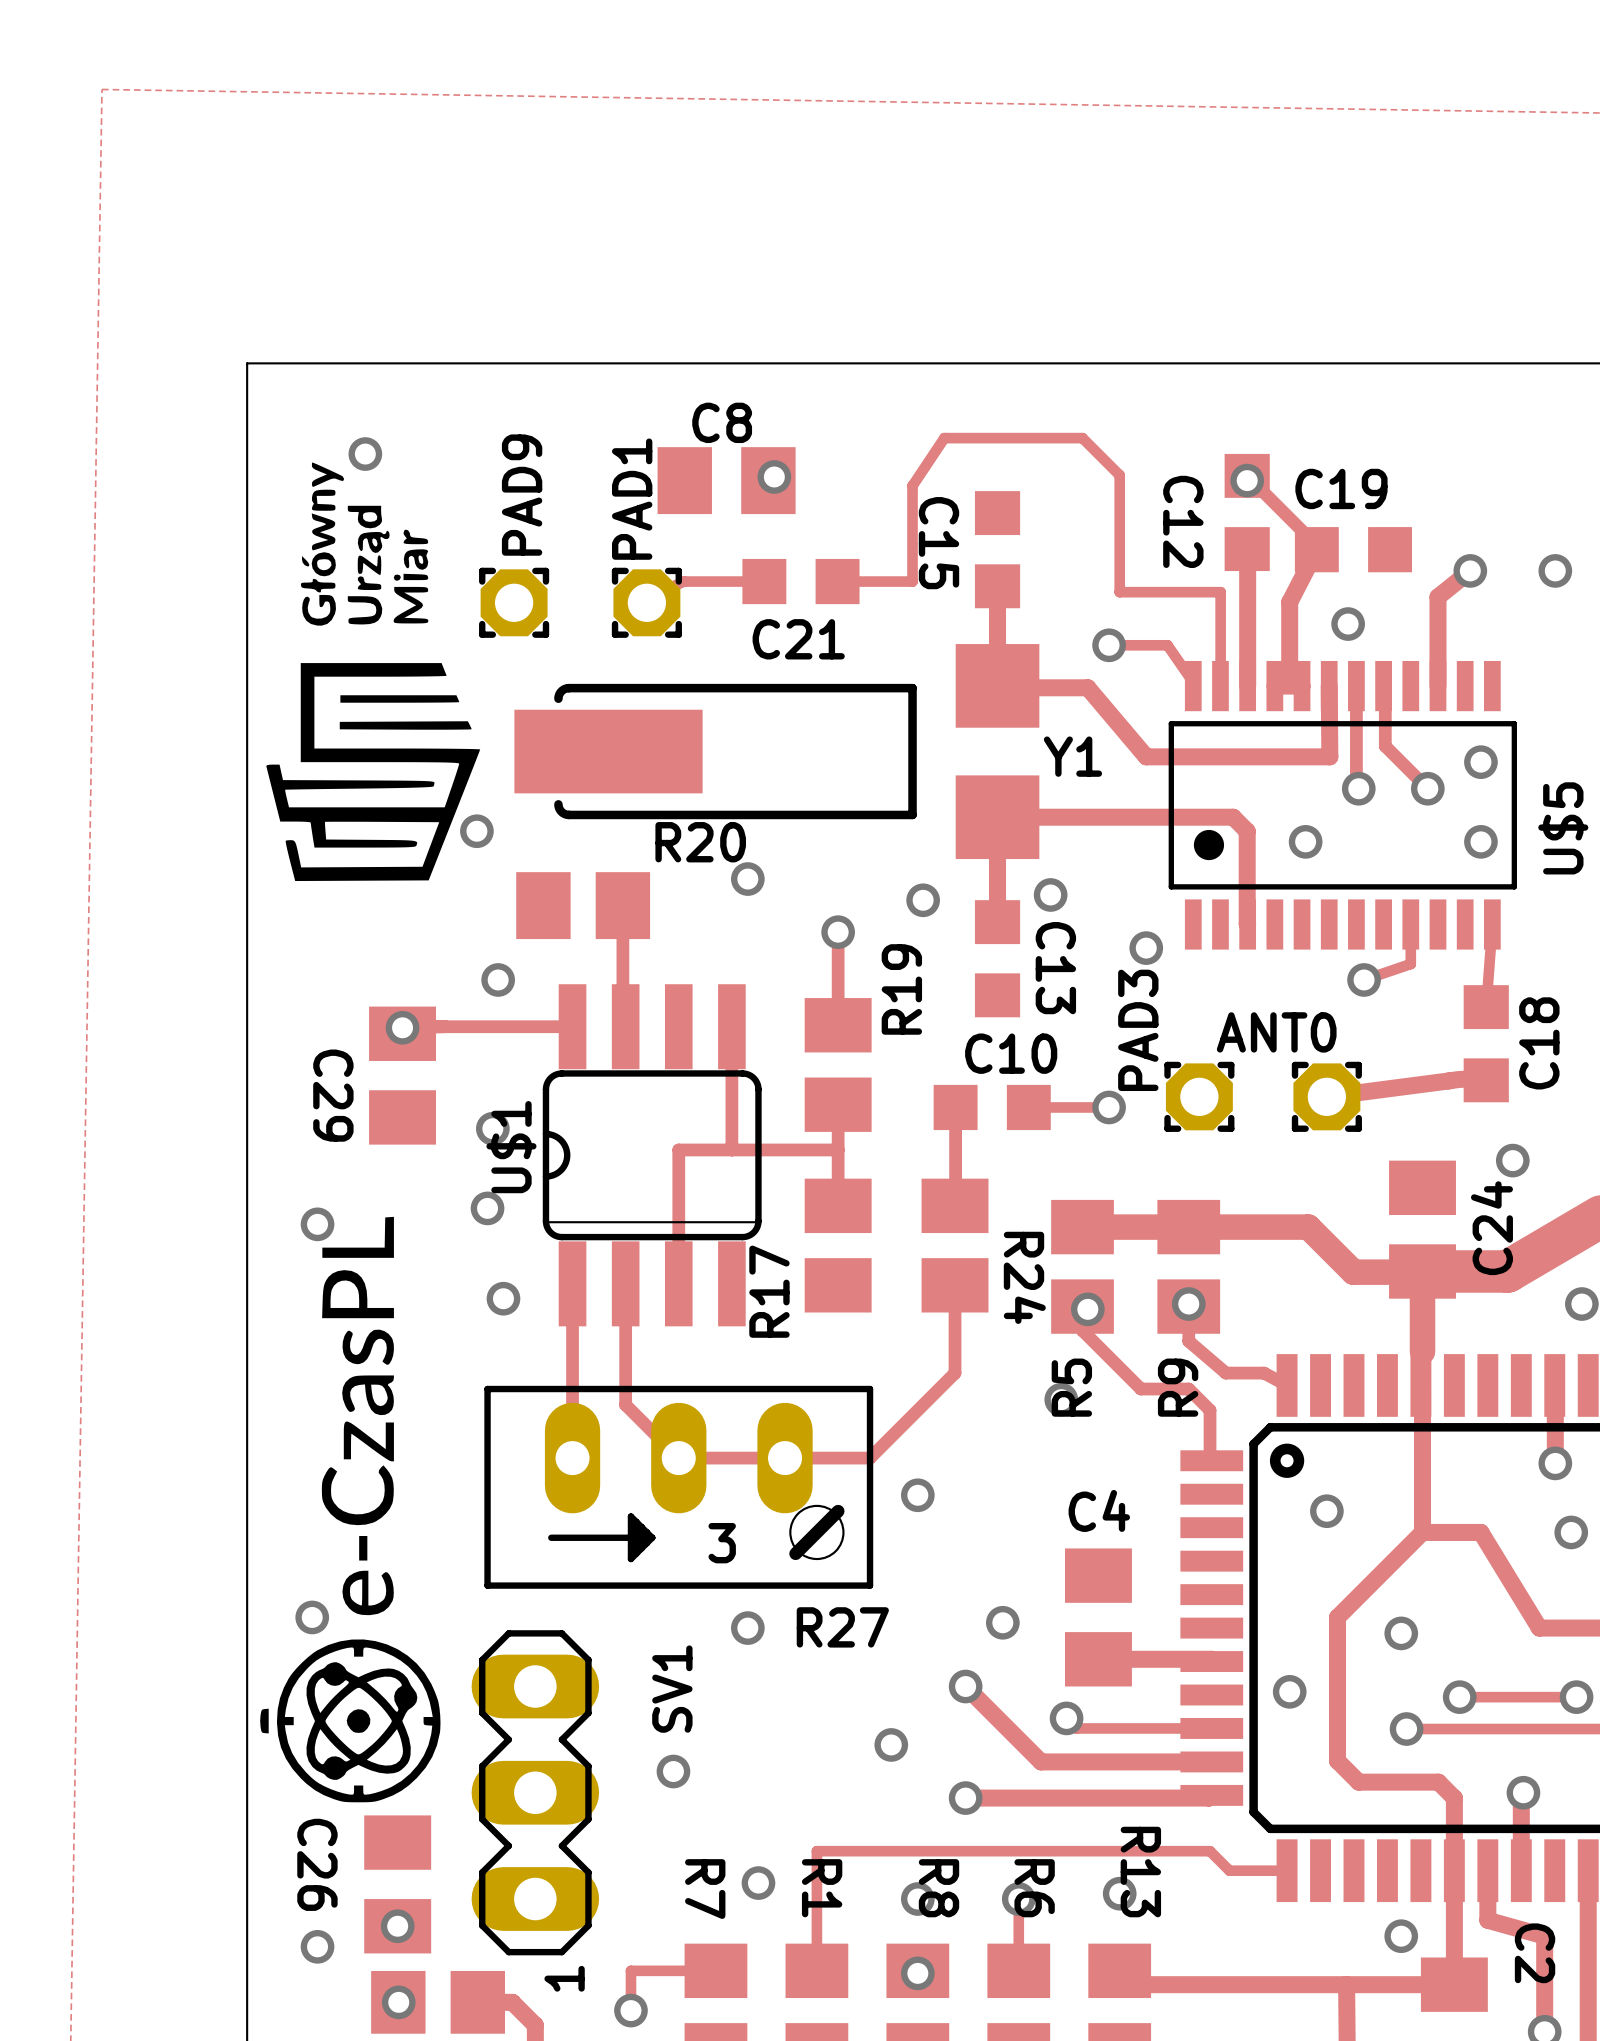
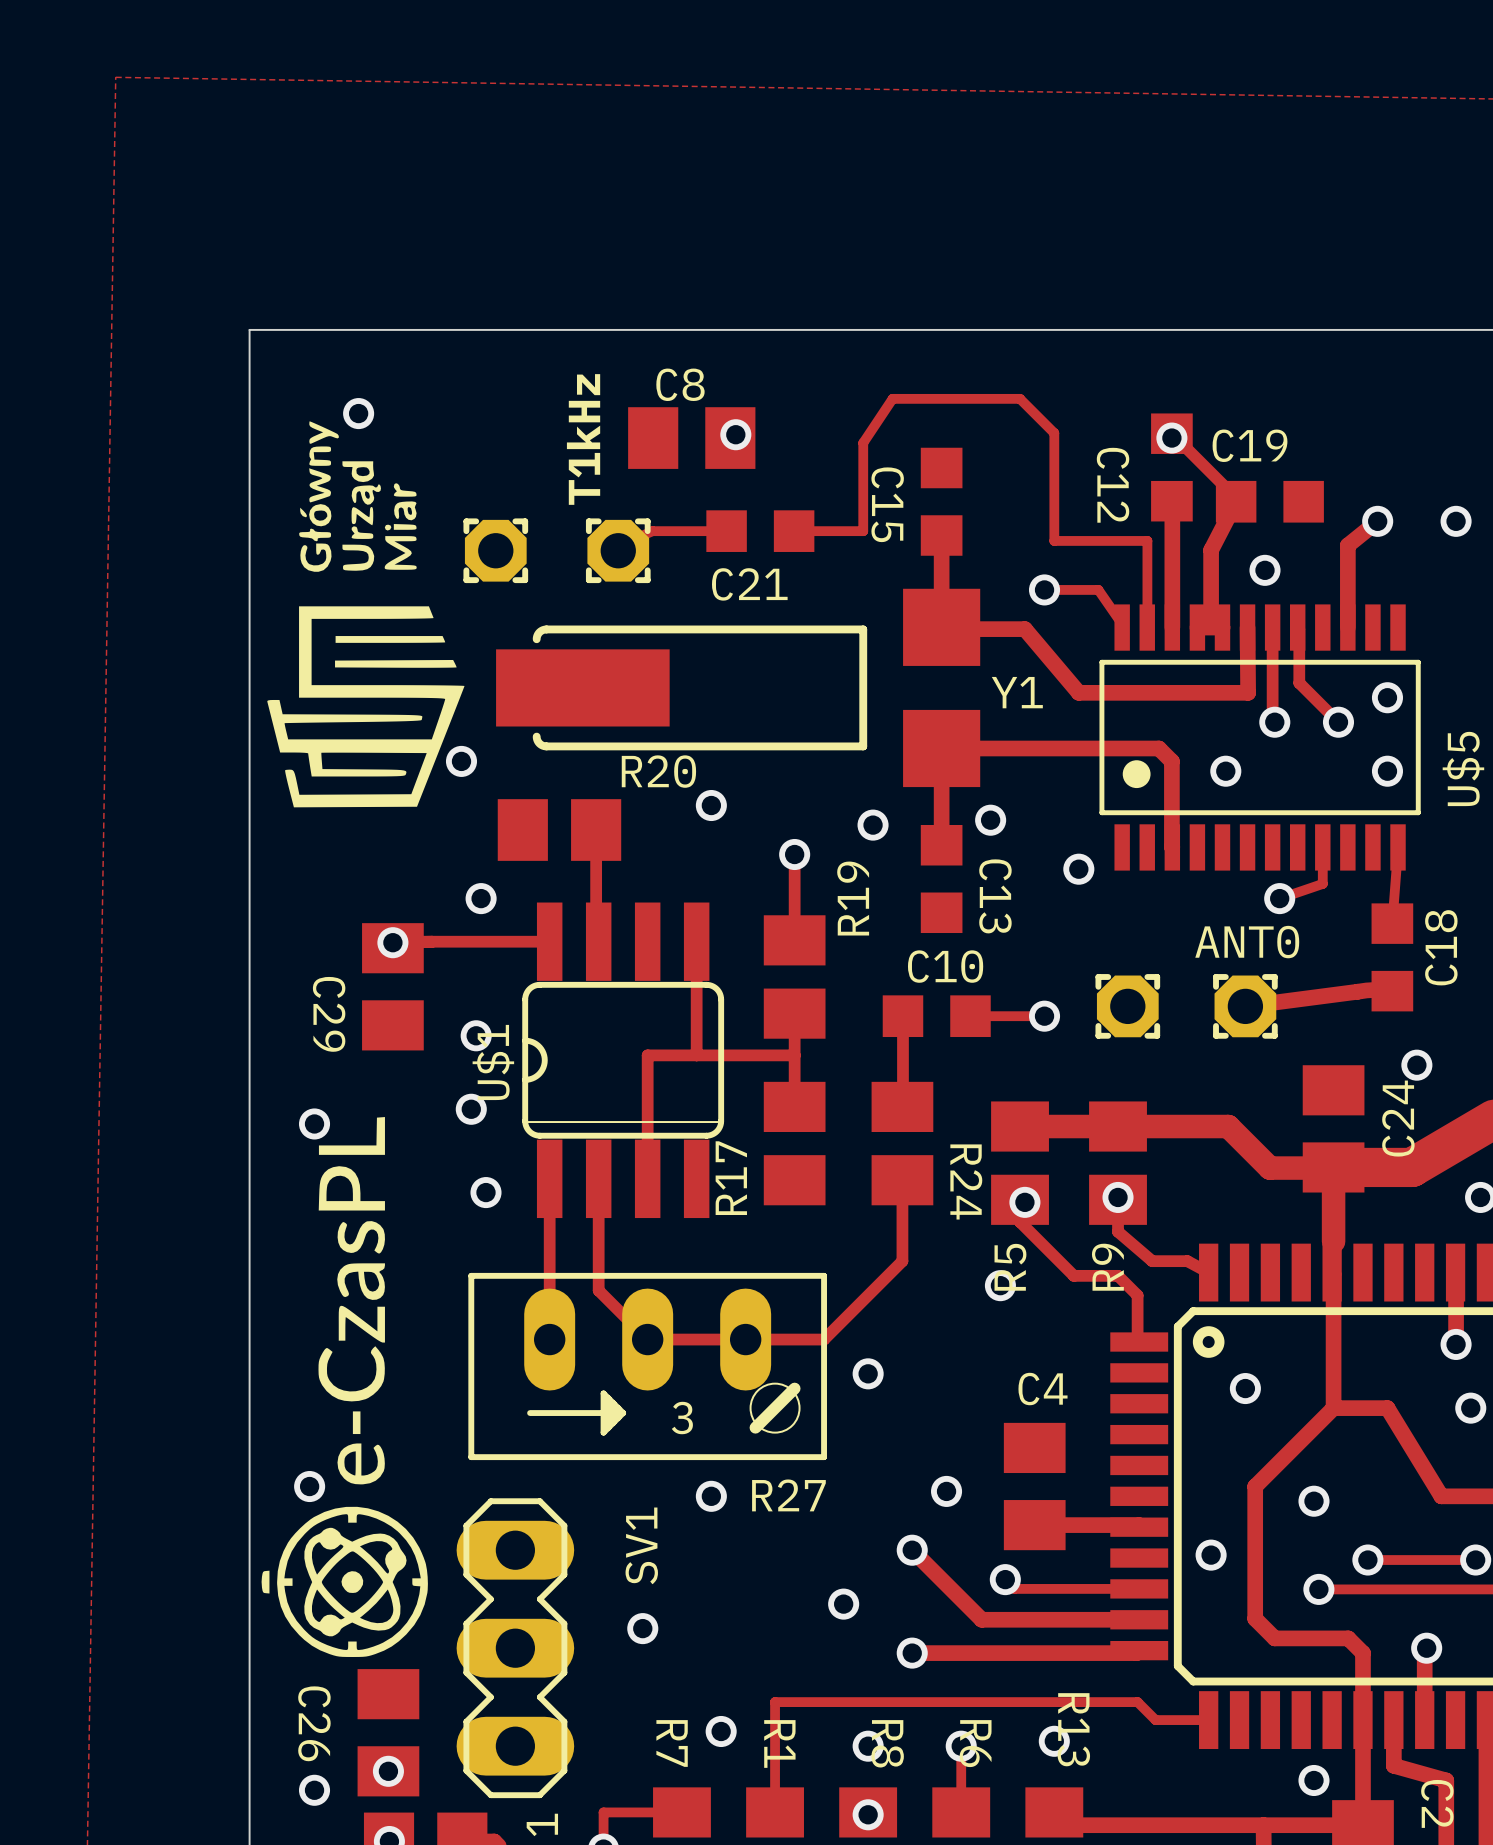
text: none -> T1kHz (583, 439)
PAD9 name: PAD9 (522, 495) -> none
PAD1 name: PAD1 (632, 499) -> none
PAD3 name: PAD3 (1138, 1030) -> none
ANT0 name position: ANT0 (1276, 1032) -> ANT0 (1247, 942)

